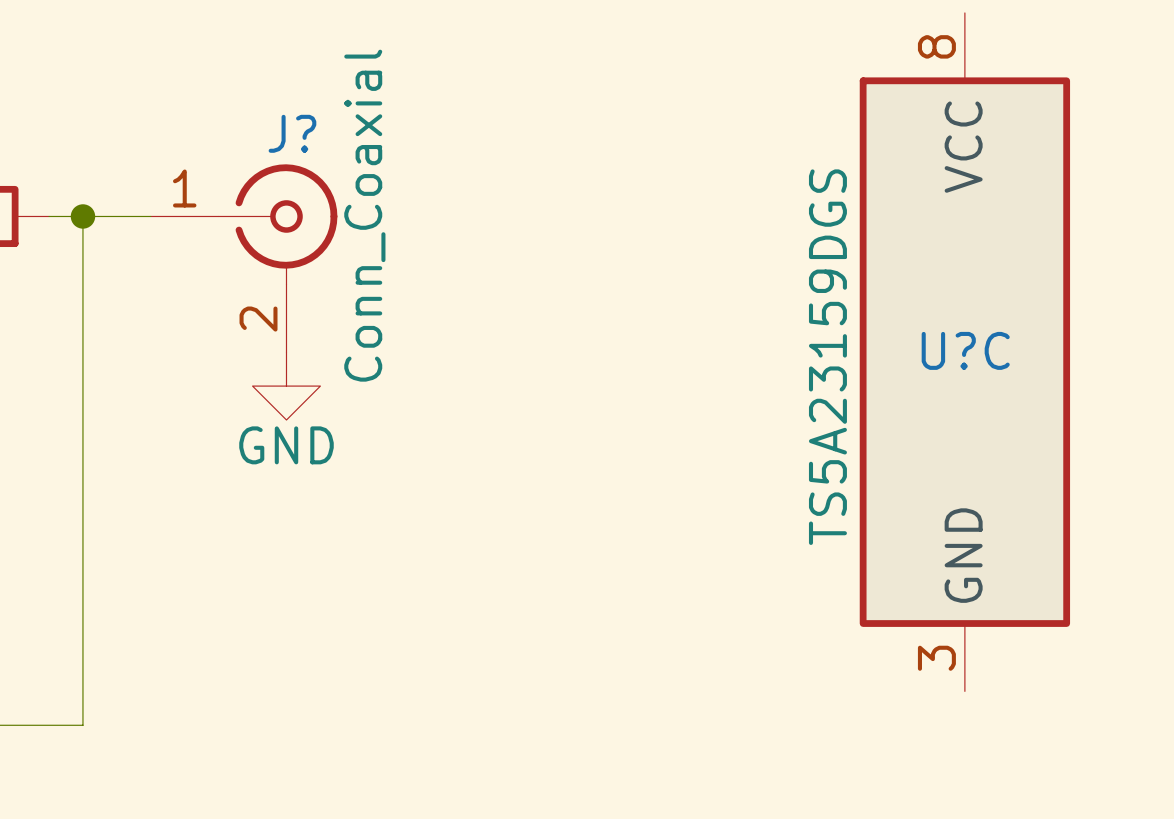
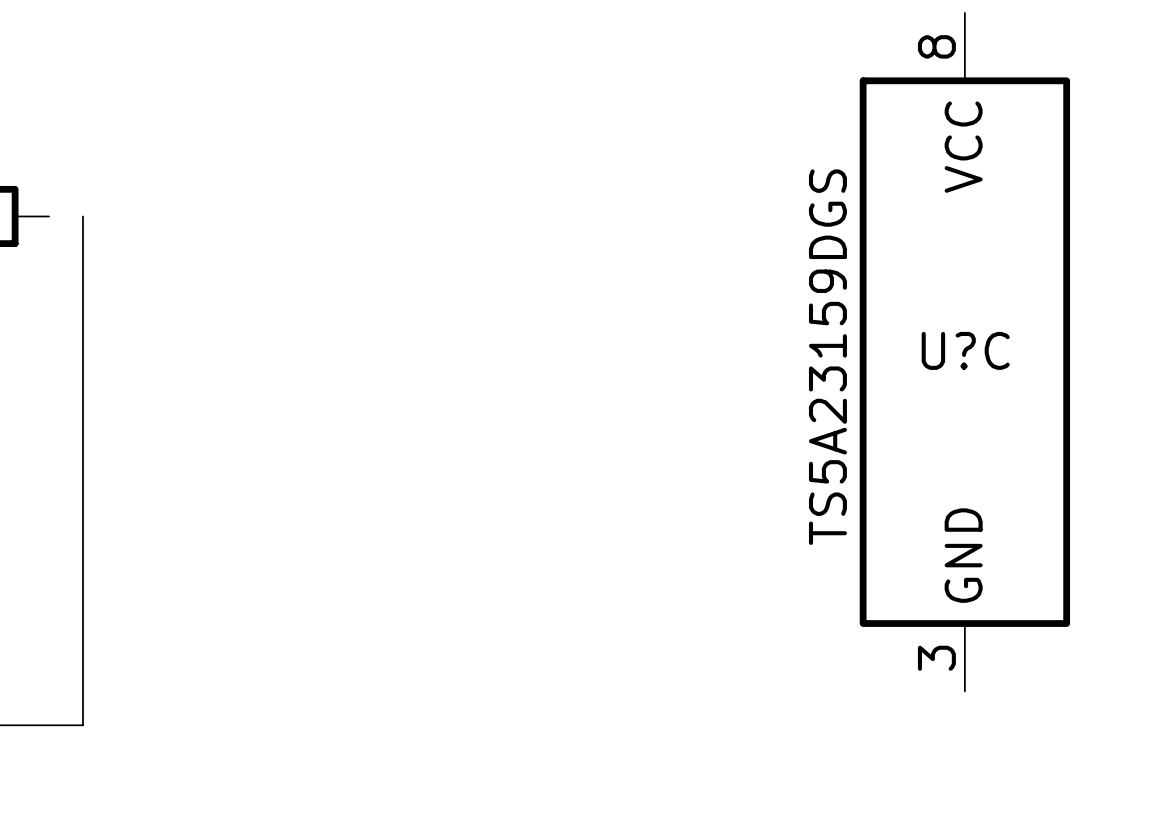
wire: (49, 216) (150, 216) -> none
junction: (82, 216) -> none
J?: Conn_Coaxial (244, 258) -> none
power symbol: GND (286, 386) -> none

